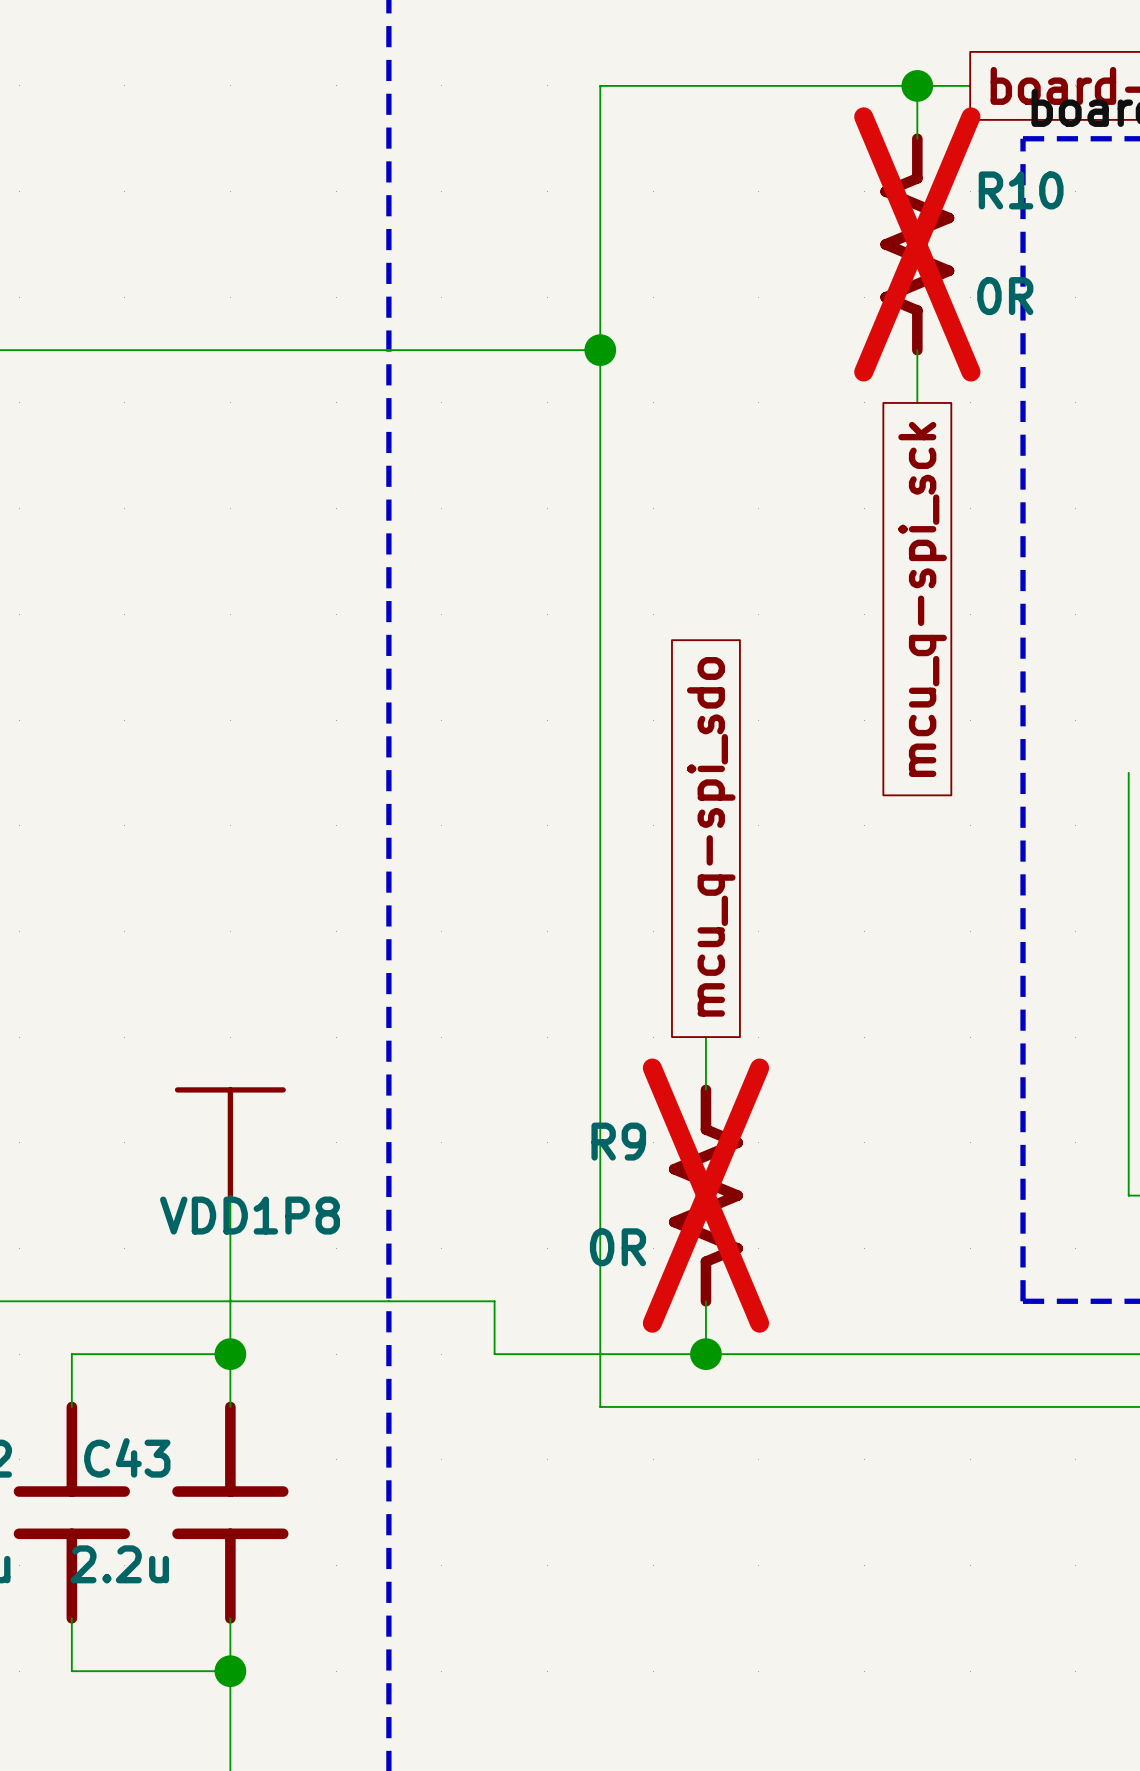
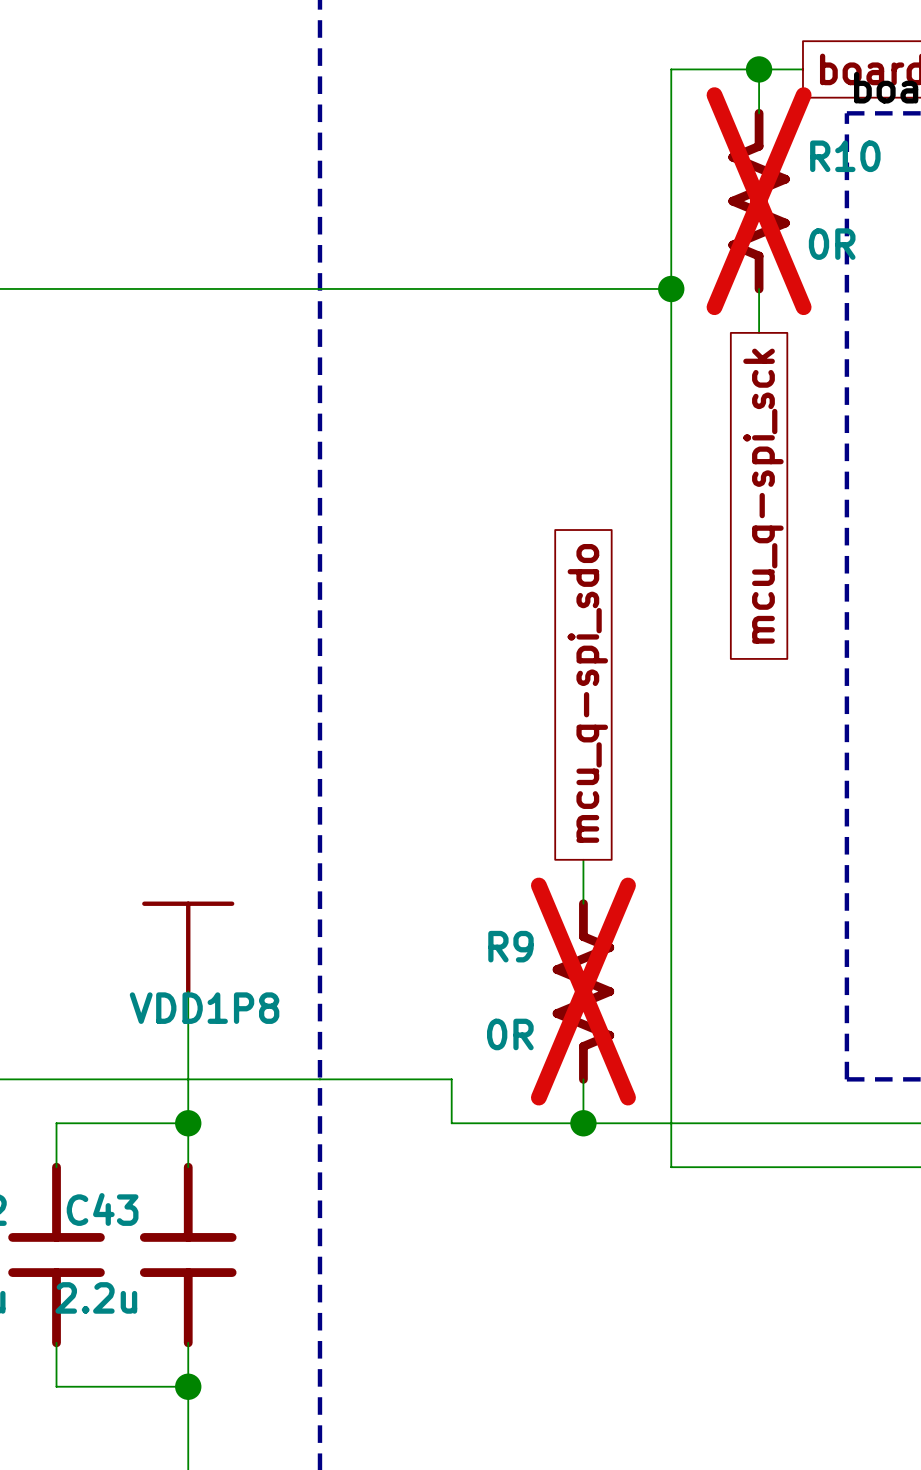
wire: (811, 85) (600, 85) (600, 1406) (811, 1406) -> (671, 69) (671, 1167)
wire: none -> (495, 288) (671, 288)
junction position: (600, 350) -> (671, 288)
wire: (494, 1301) (494, 1354) (547, 1354) -> (407, 1079) (451, 1079) (451, 1123)

